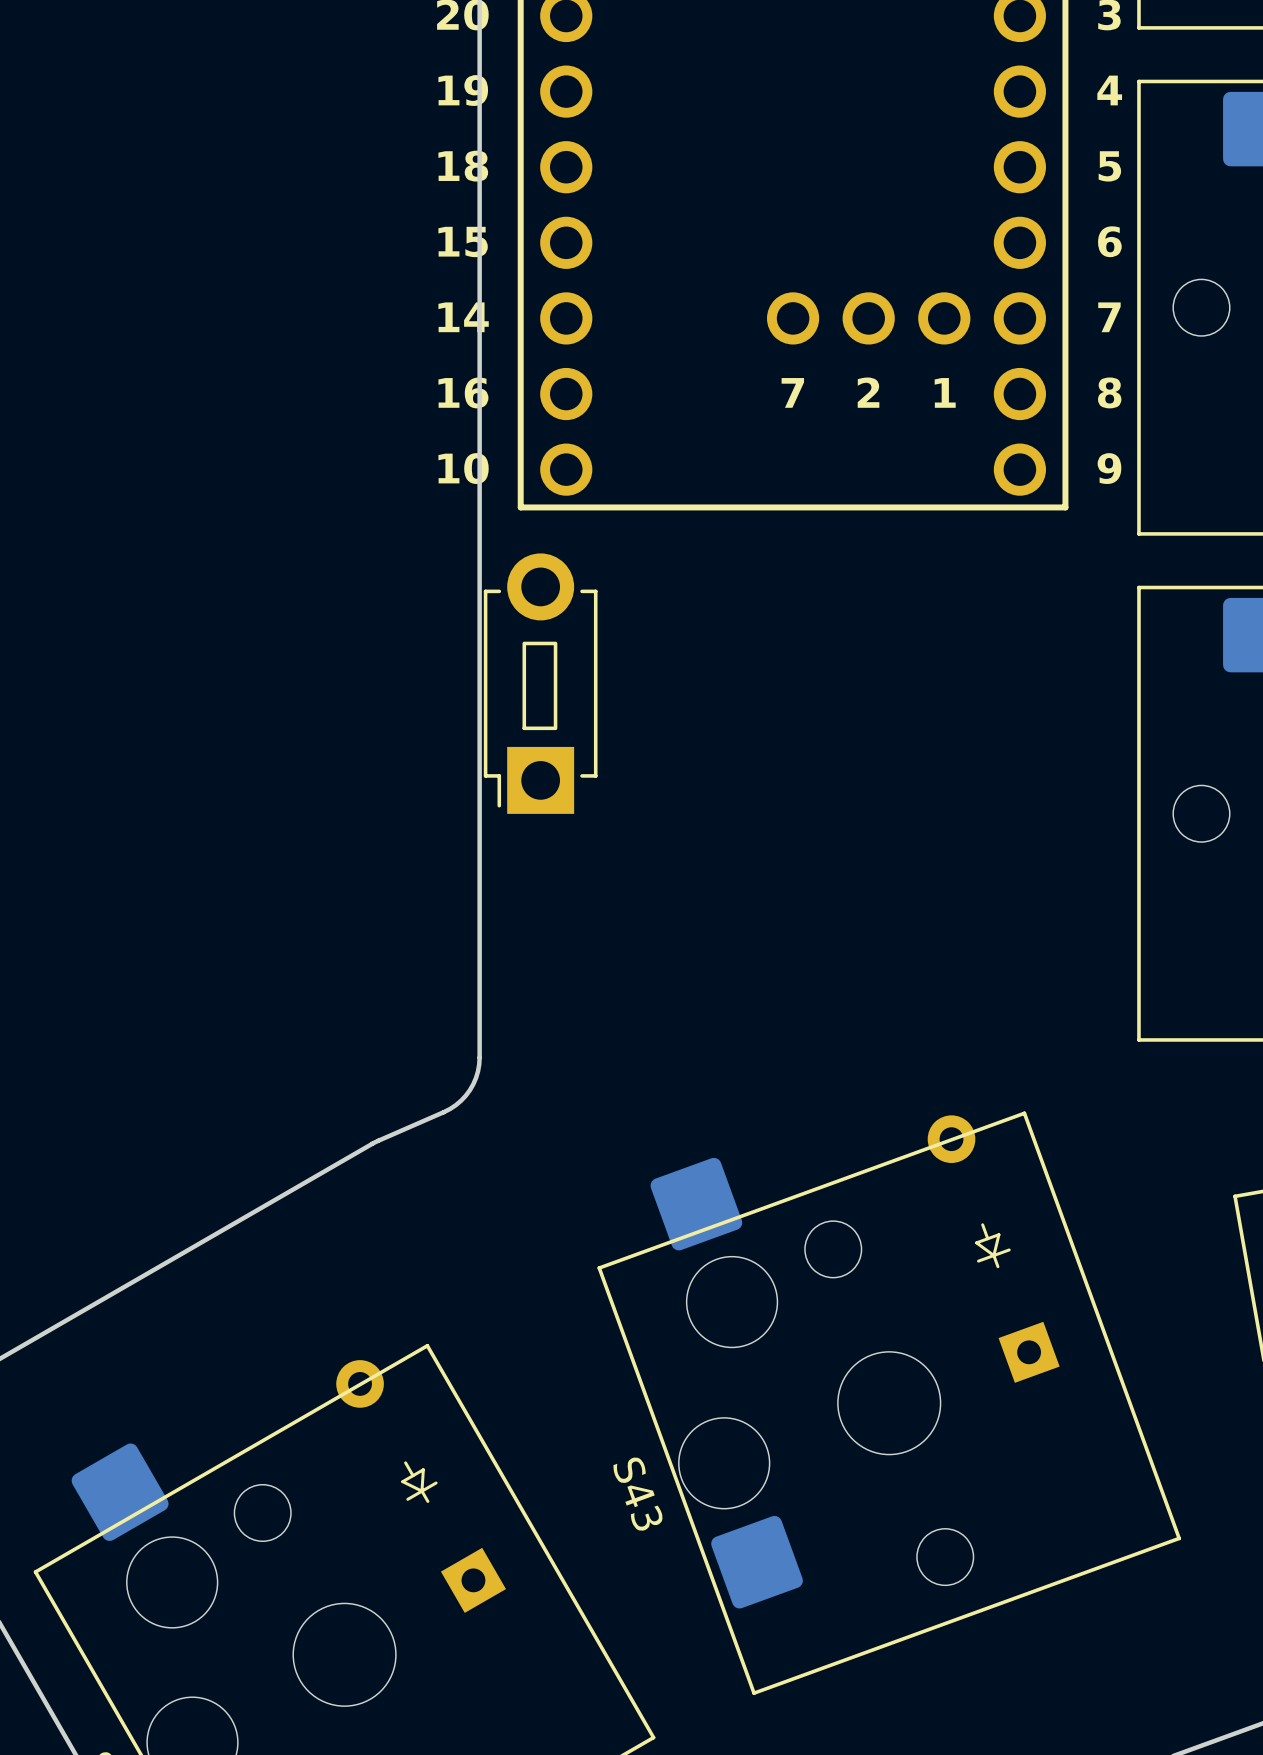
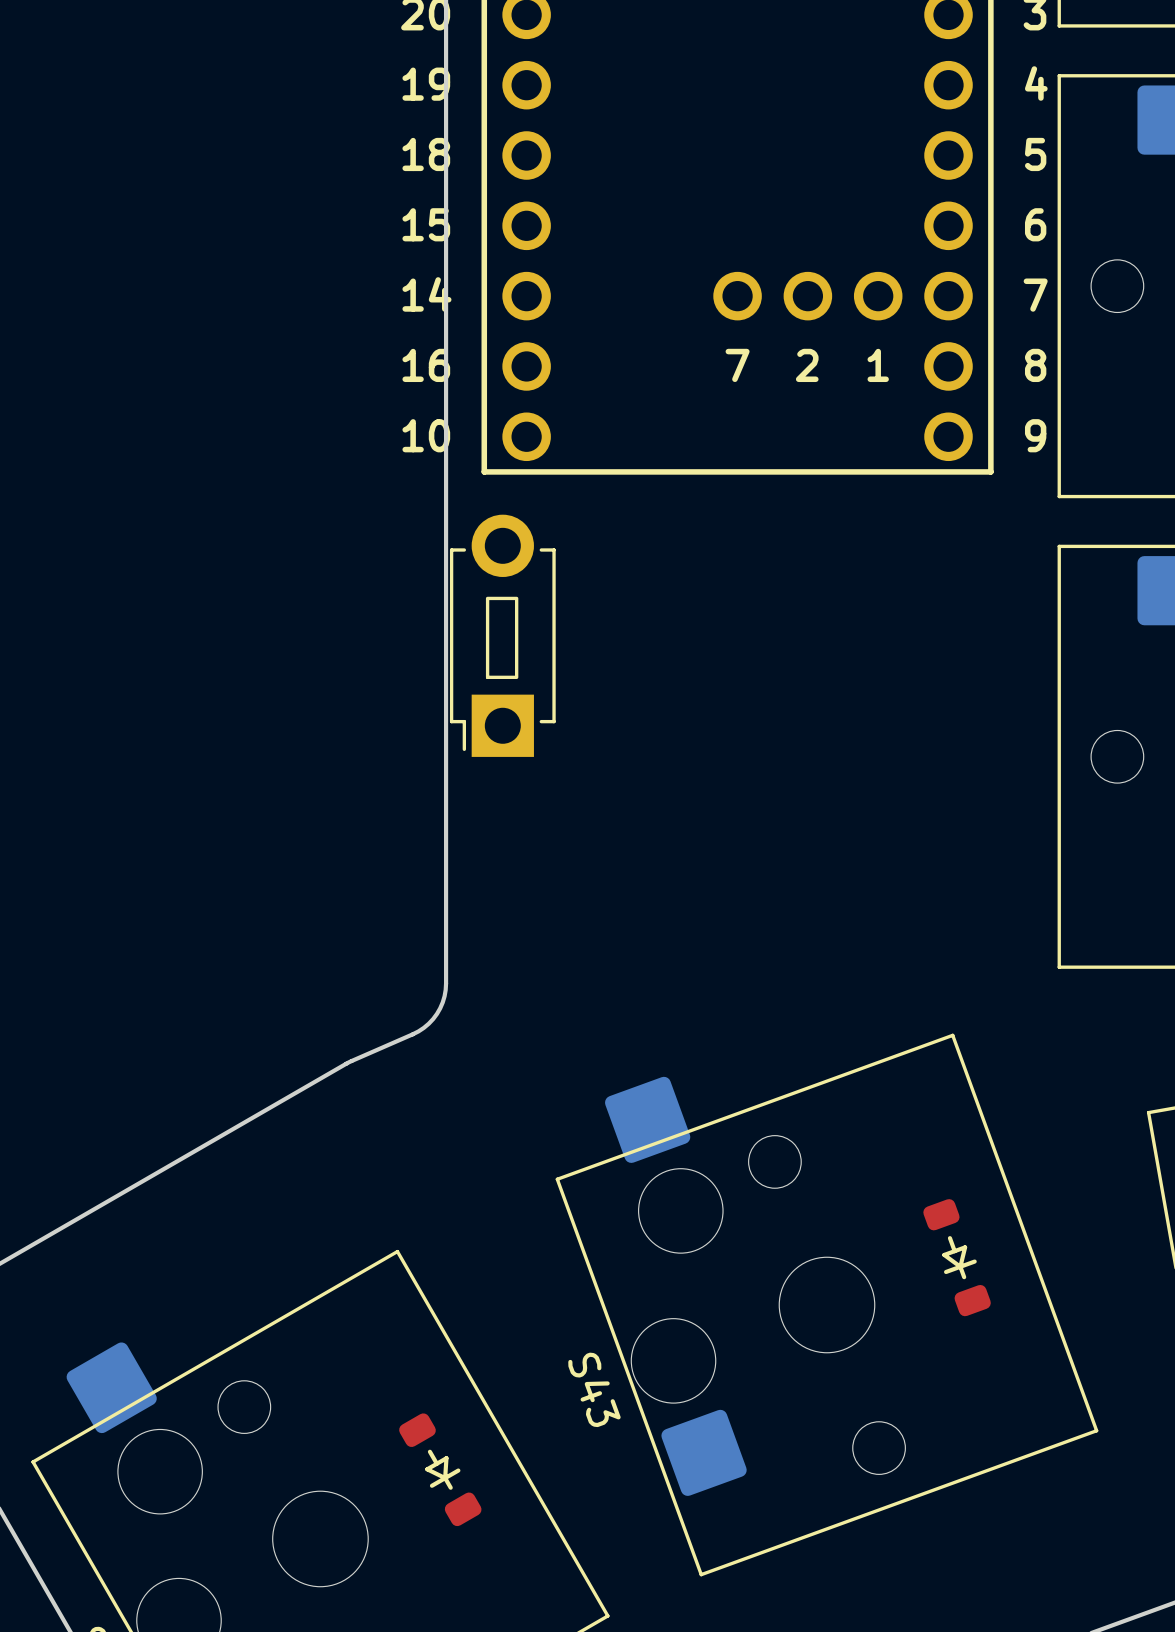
part: (993, 1249) -> none
part: none -> (957, 1257)
part: (421, 1486) -> none
part: none -> (440, 1469)

